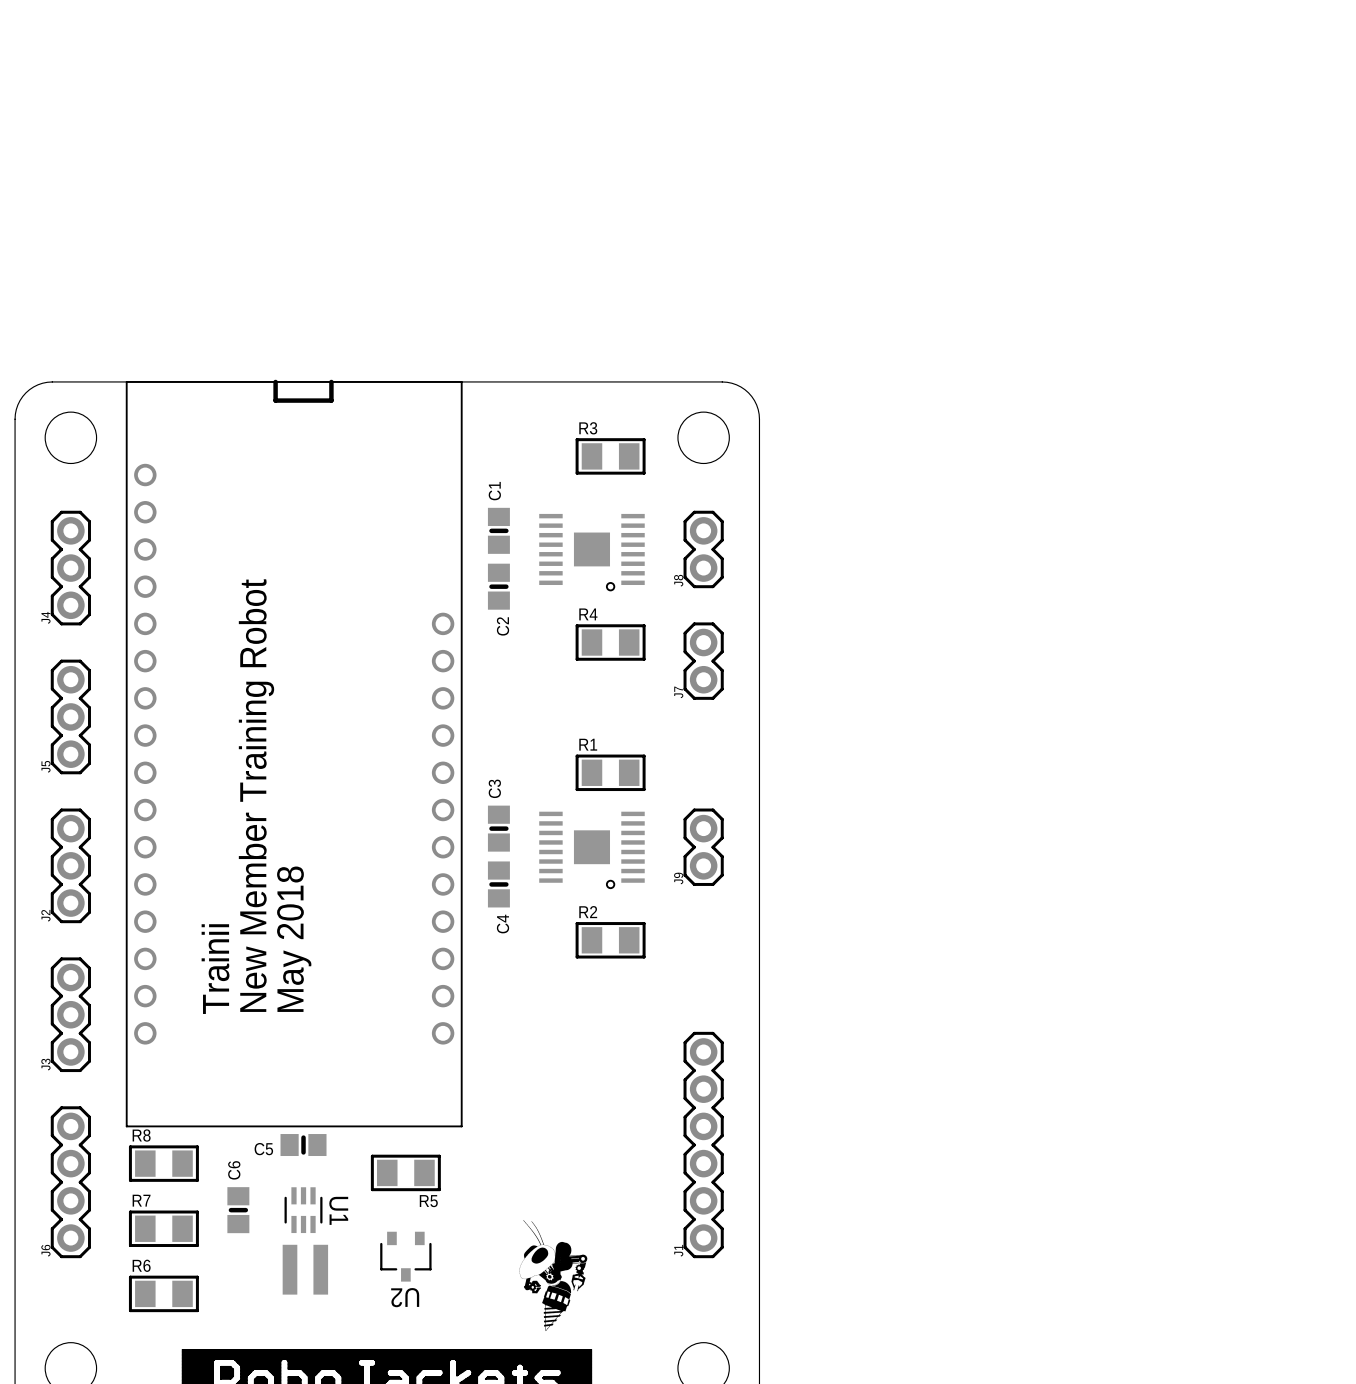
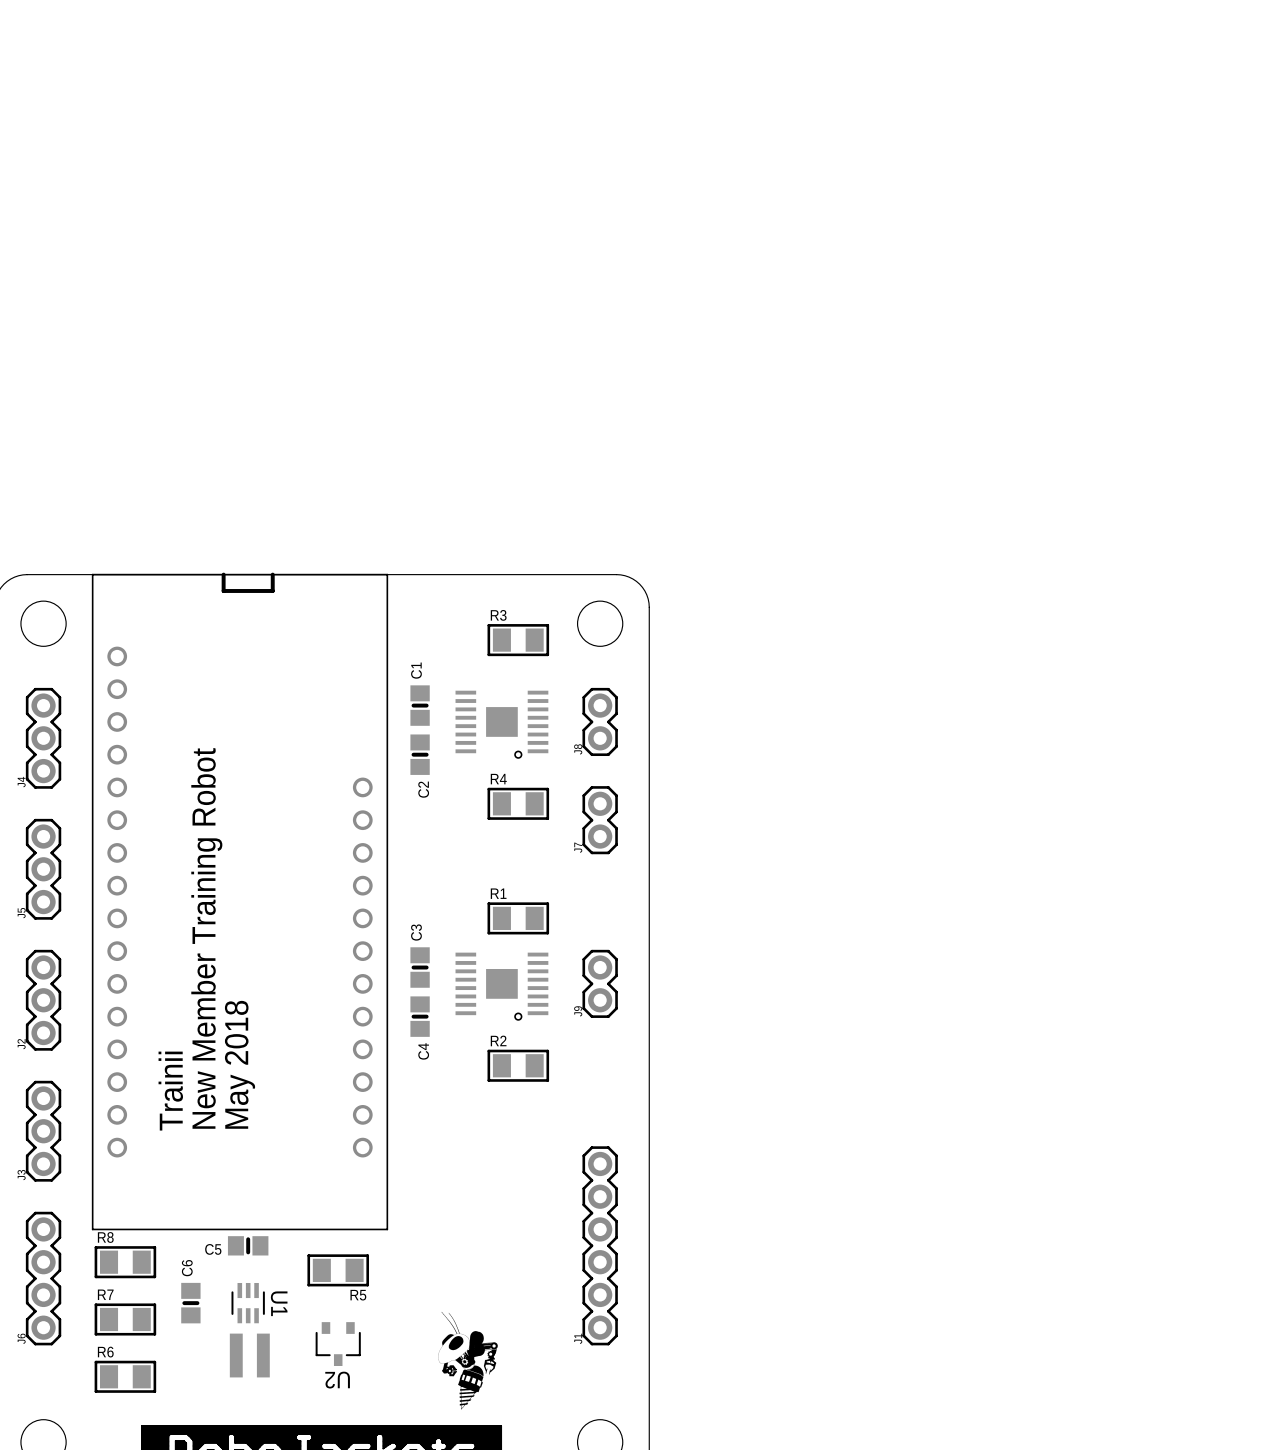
part footprint: [125, 381, 463, 1128] -> [91, 573, 389, 1231]

